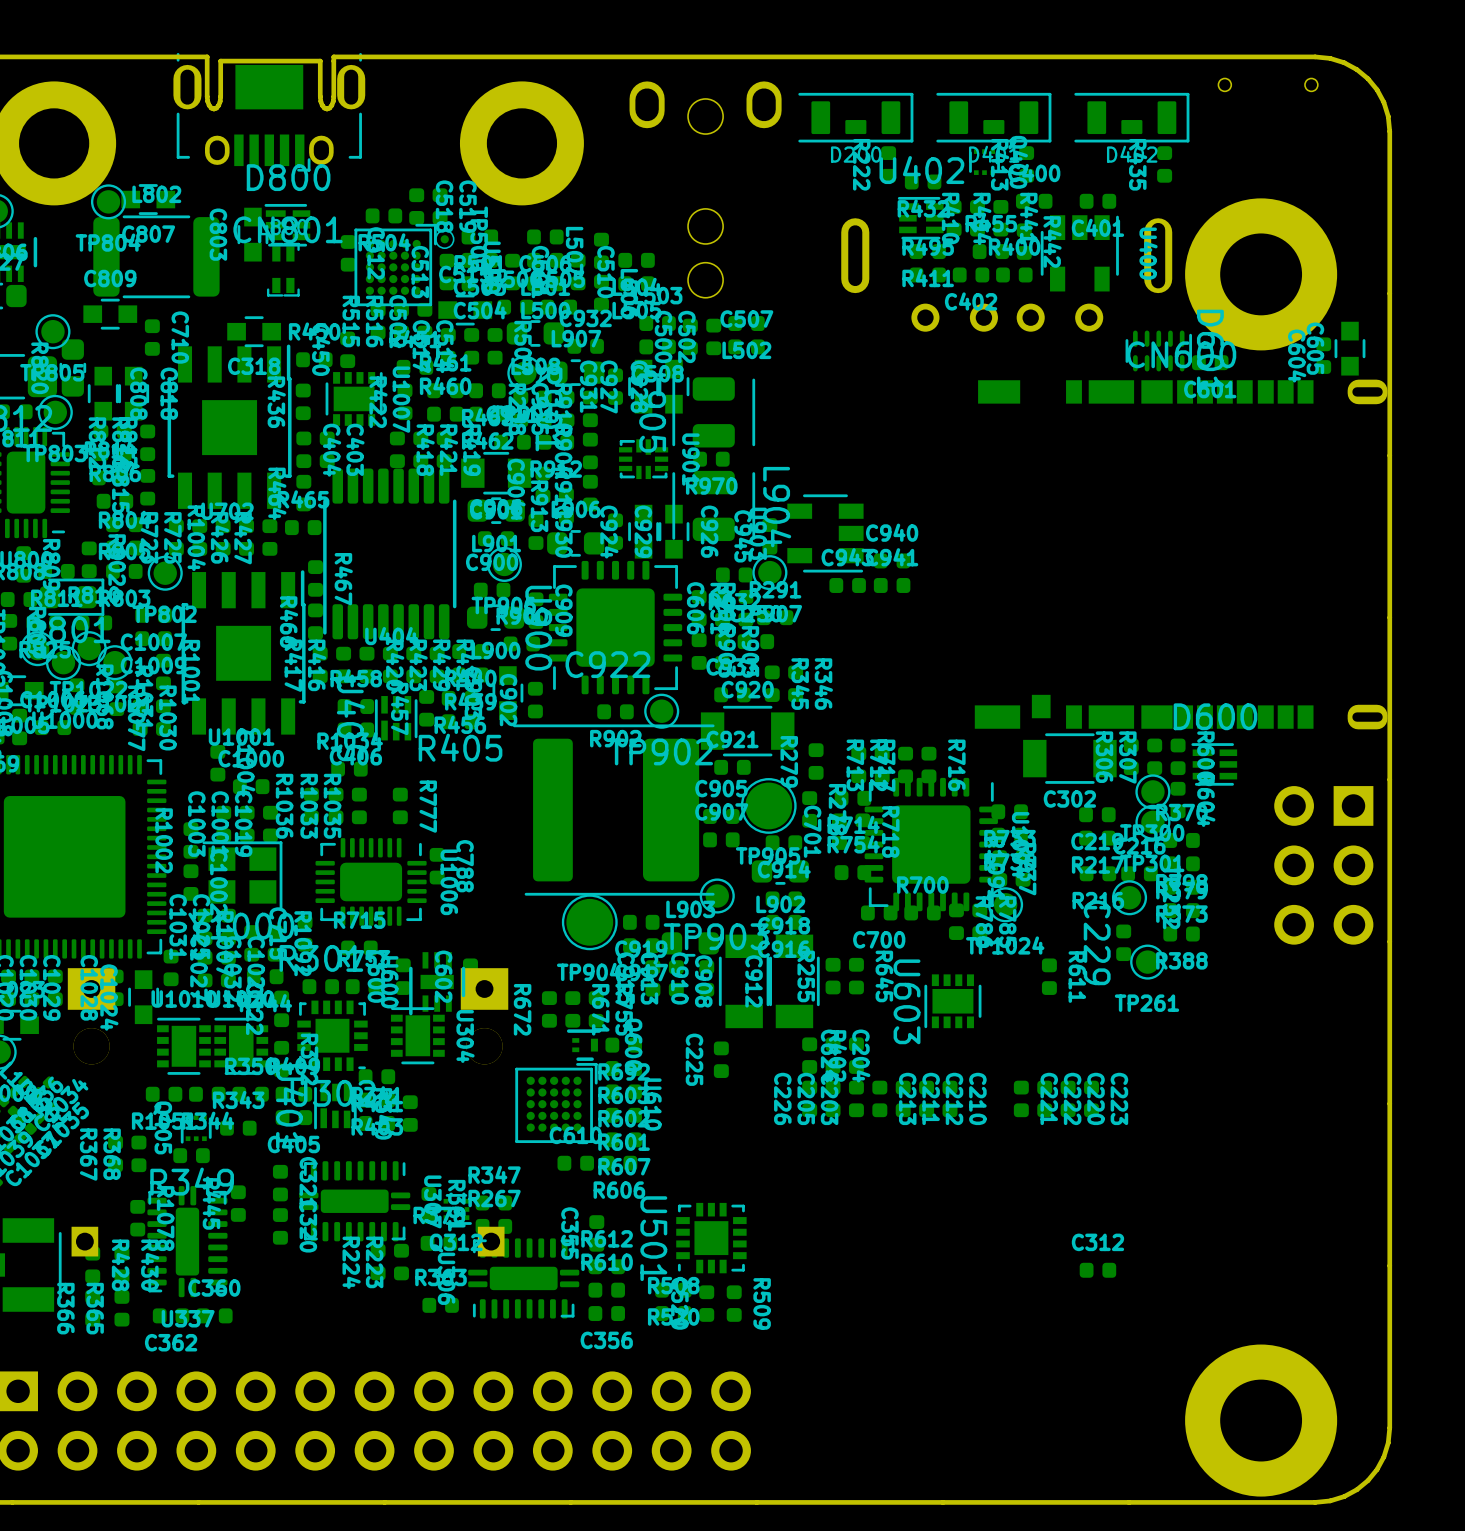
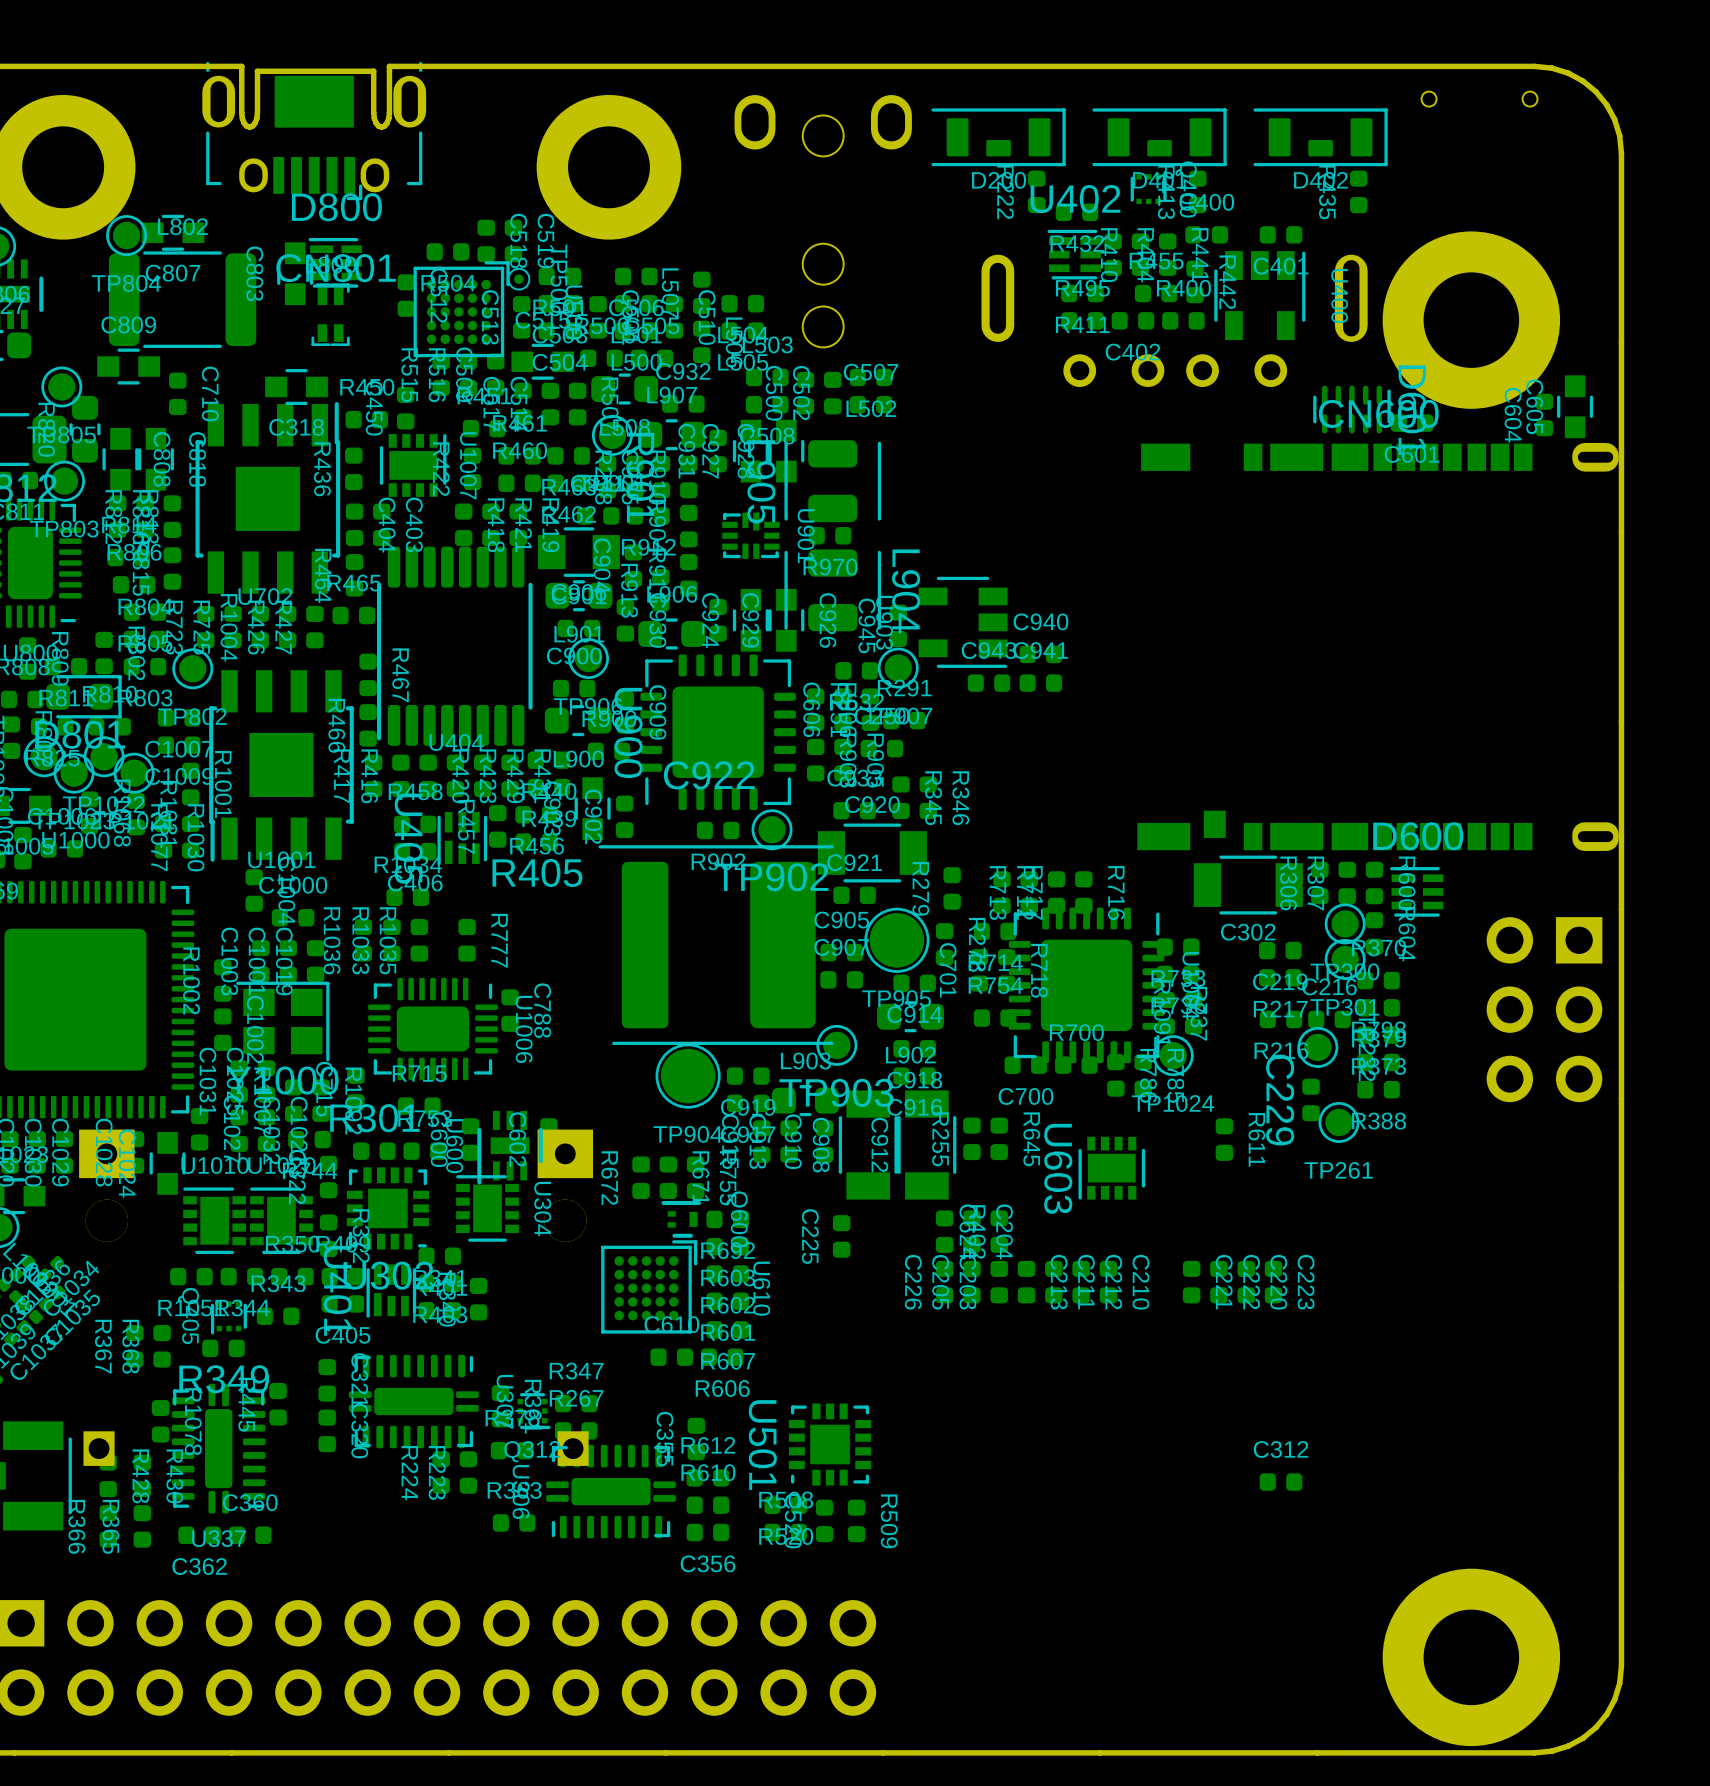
U1001 rotation: 0° (243, 652) -> 180° (281, 766)

